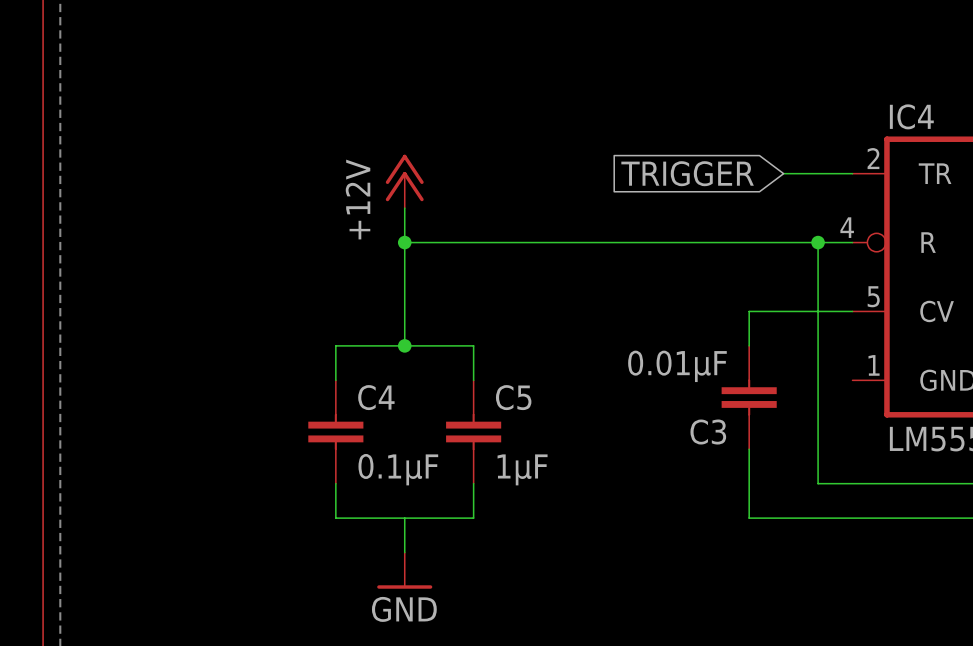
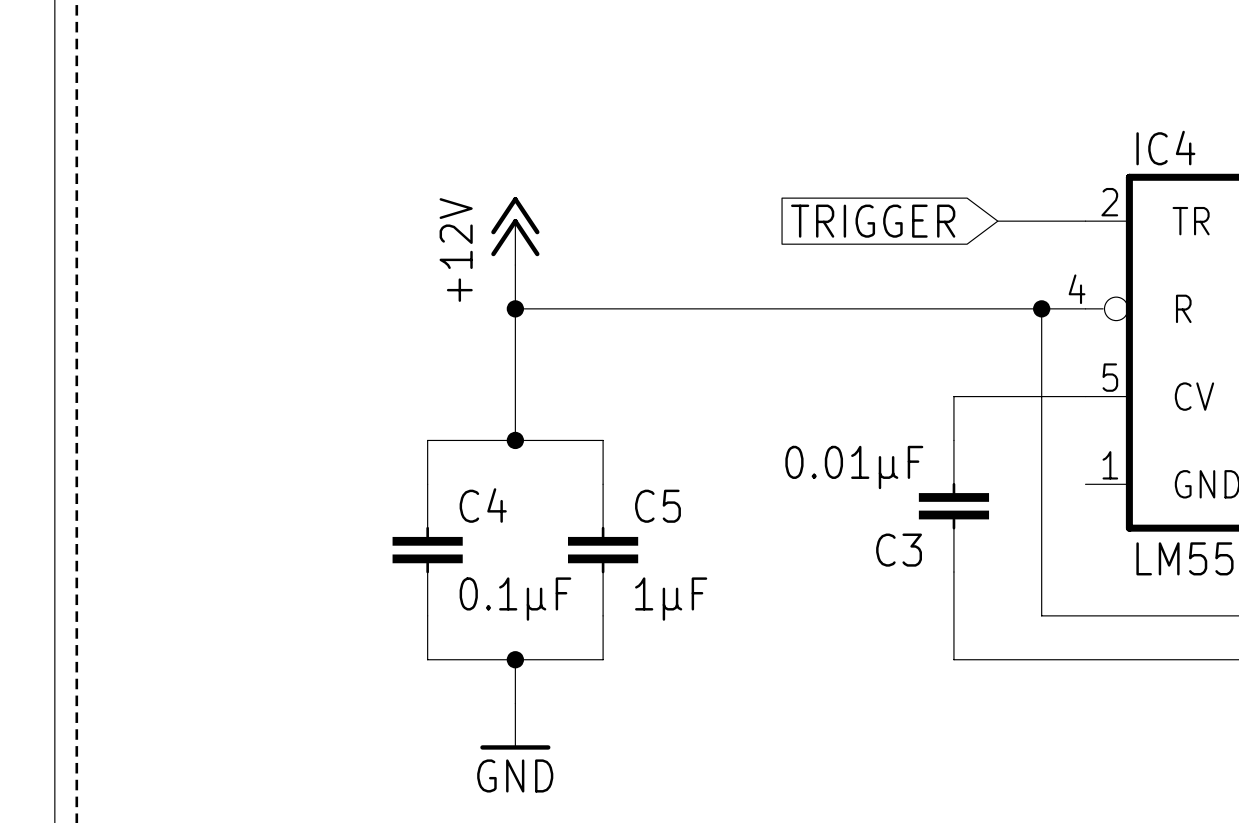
junction: none -> (515, 659)

